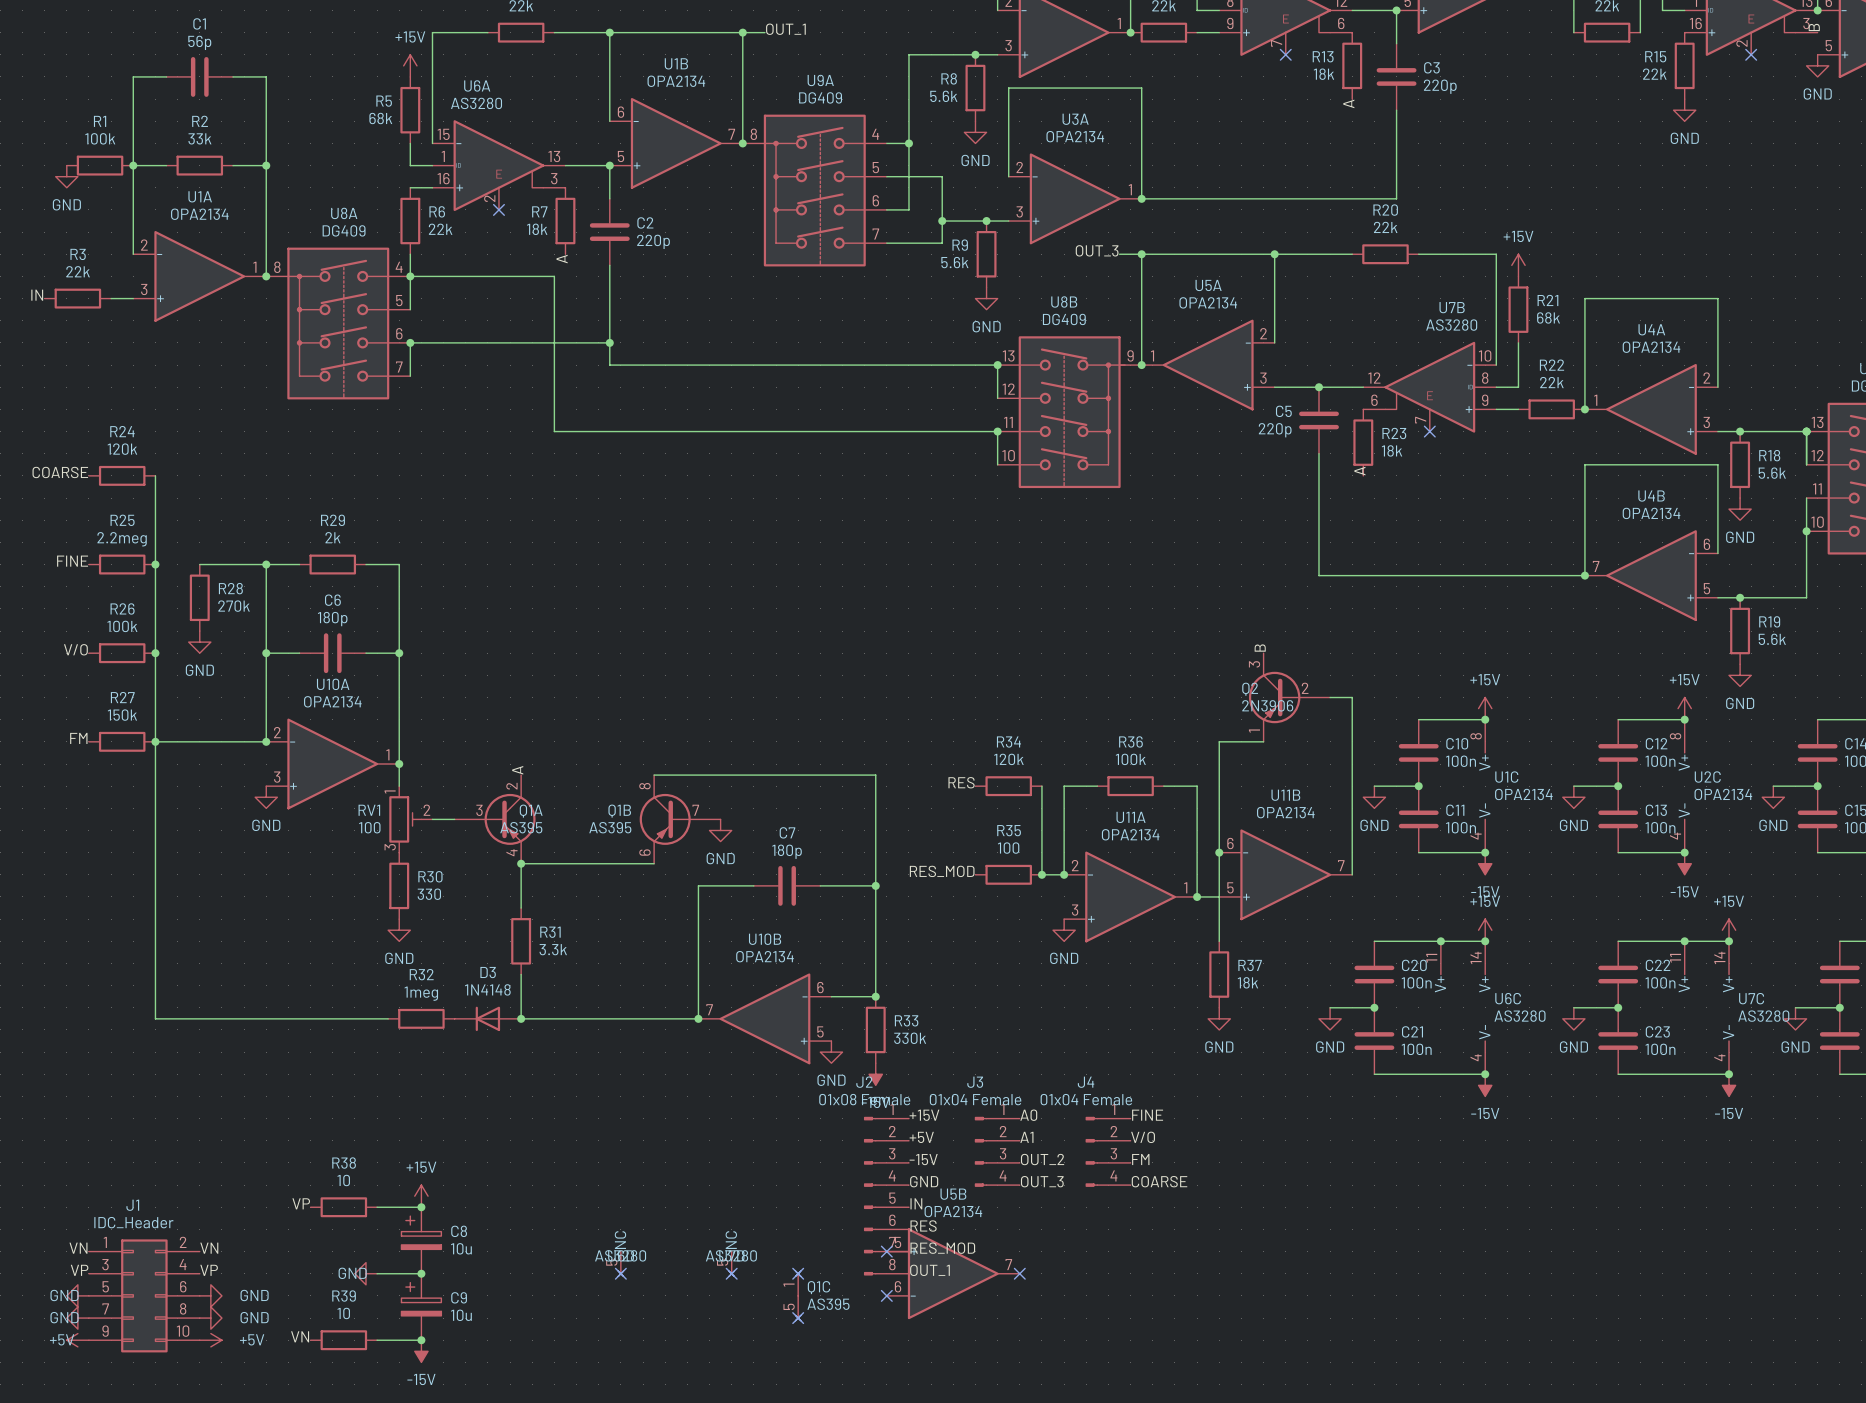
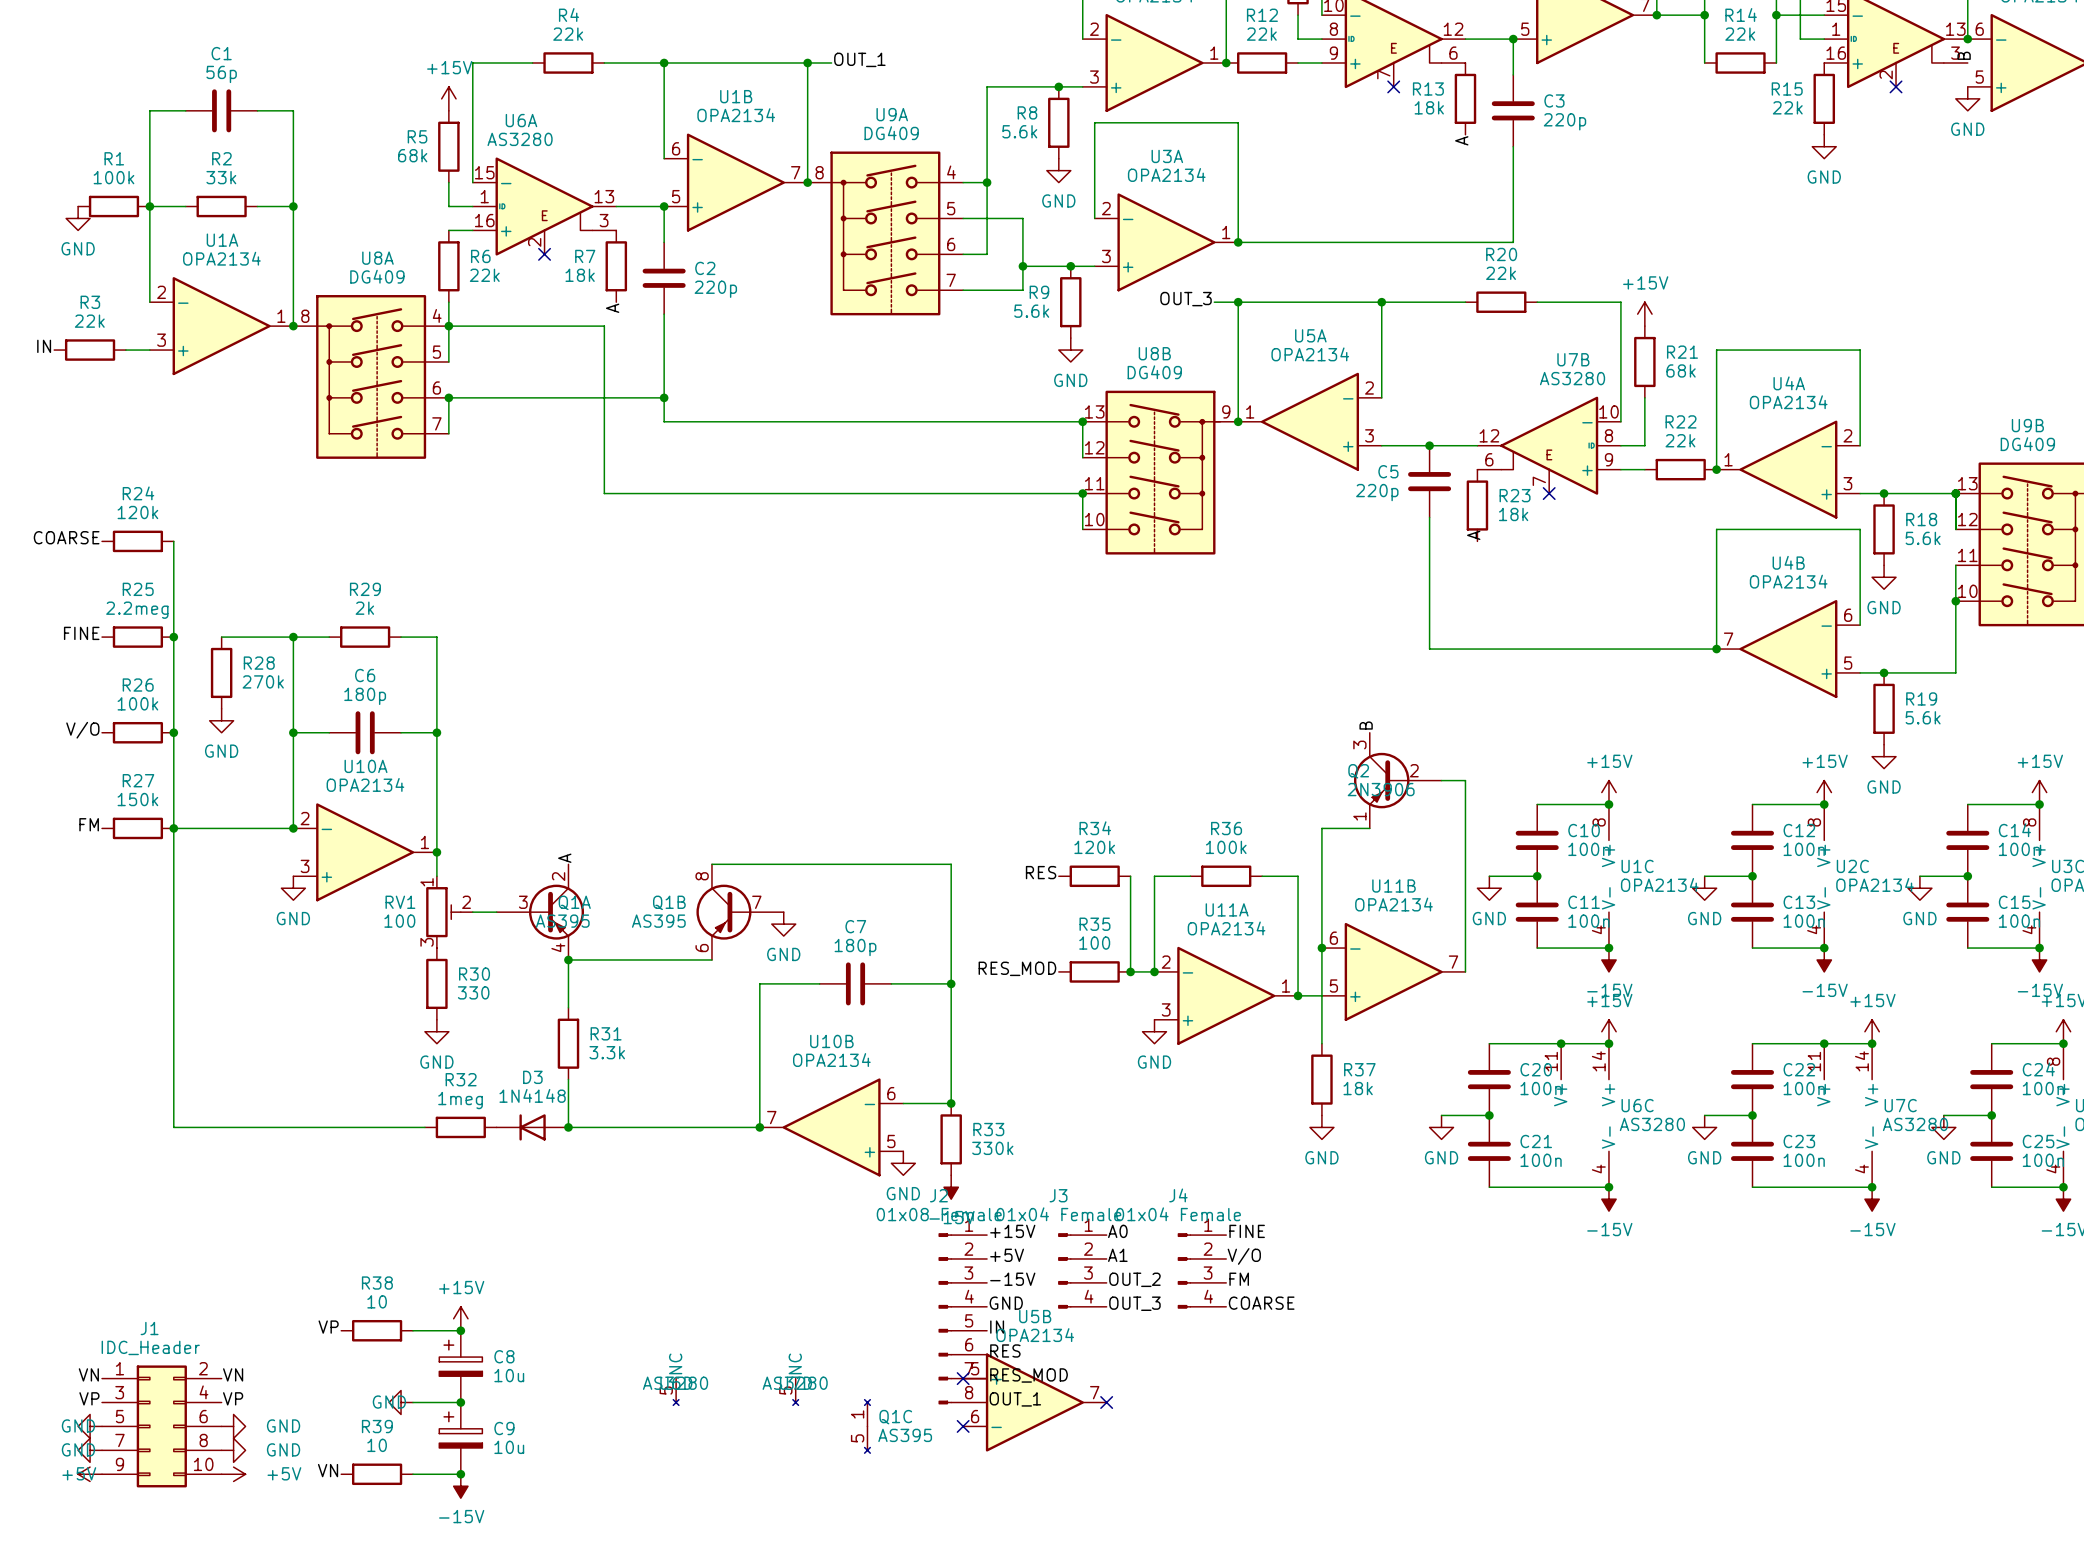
no-connect mark: (620, 1273) -> none
no-connect mark: (731, 1273) -> none
no-connect mark: (798, 1273) -> none
no-connect mark: (798, 1318) -> none

